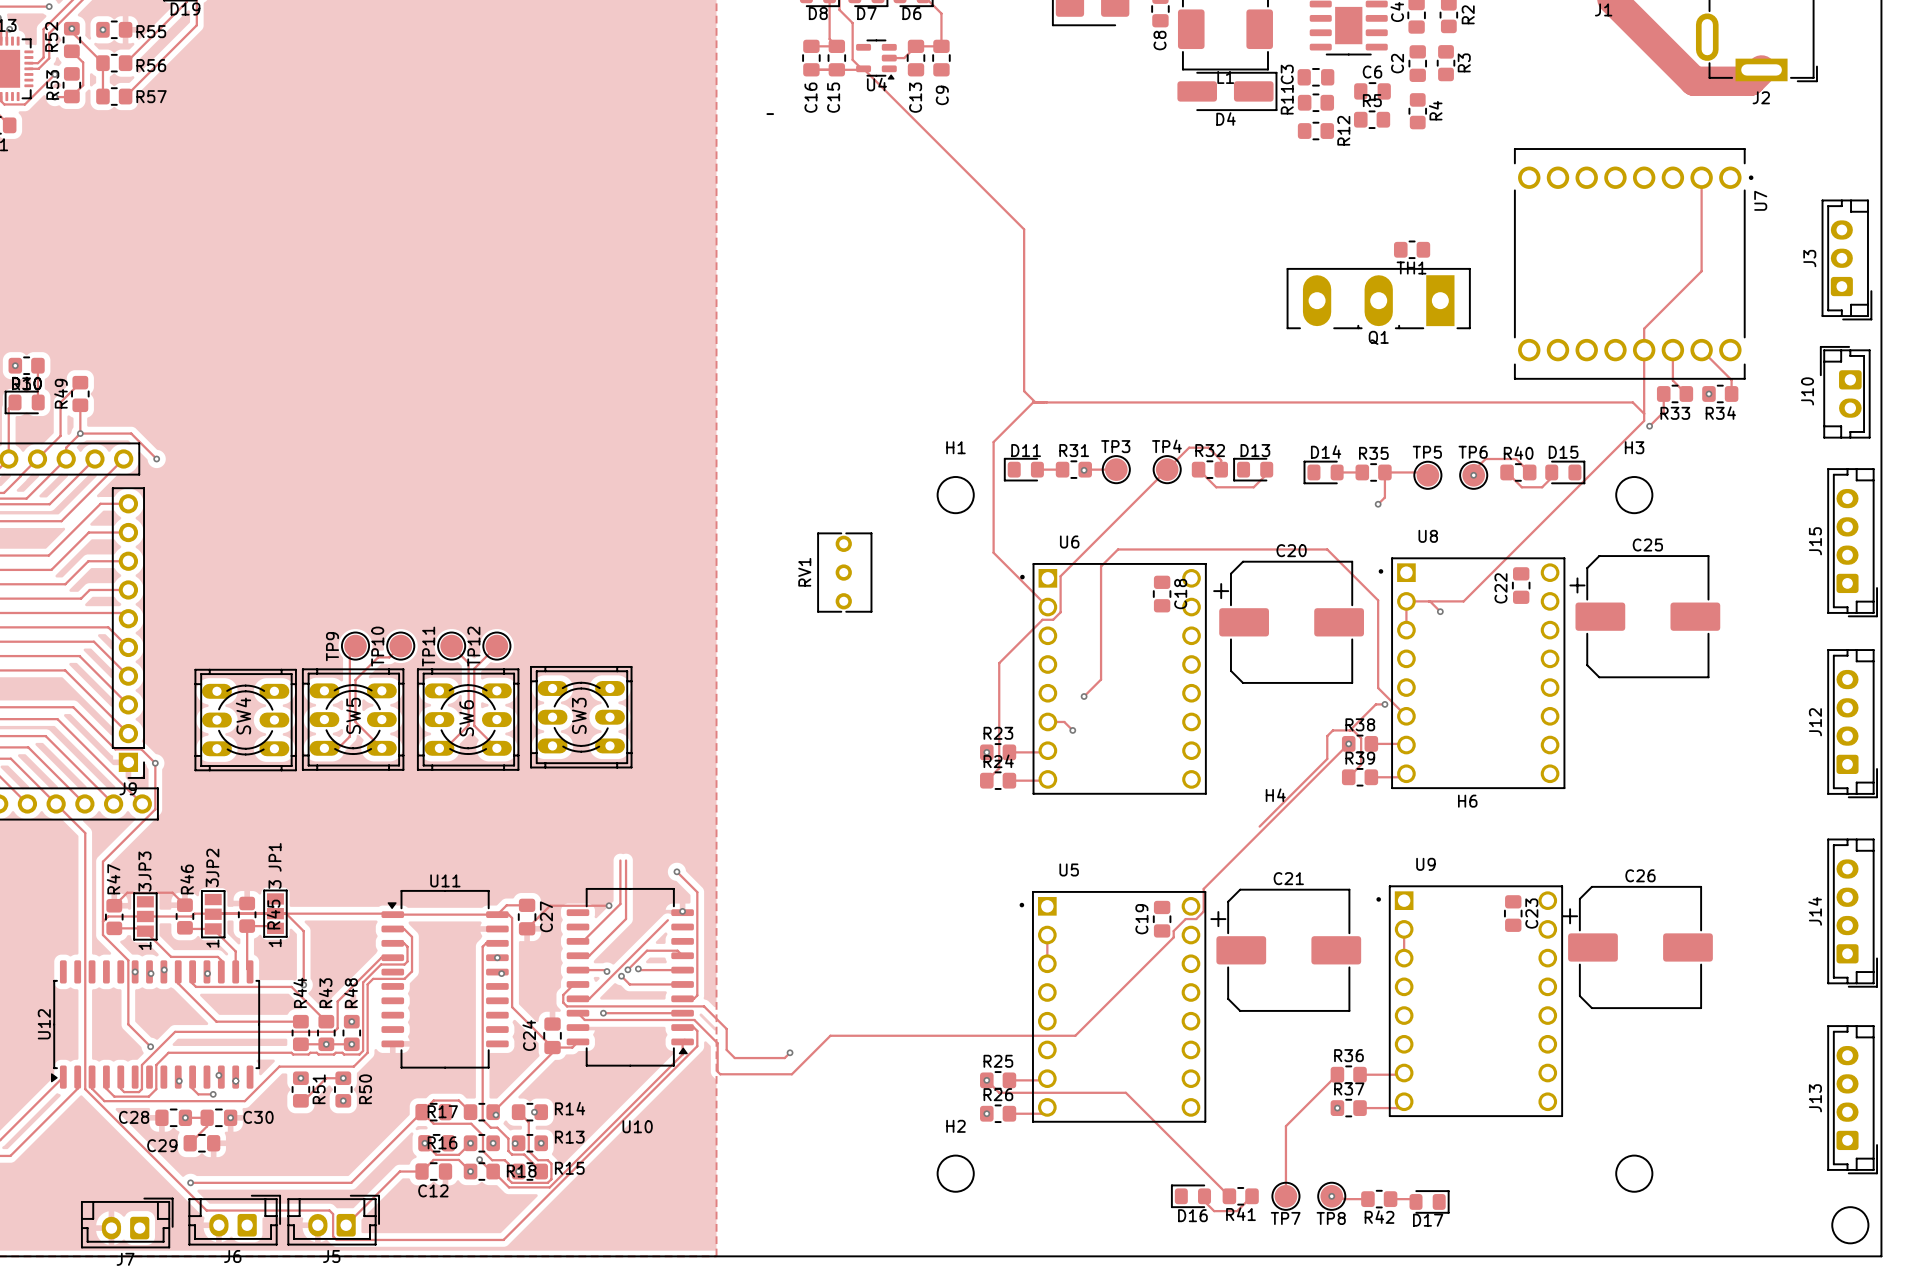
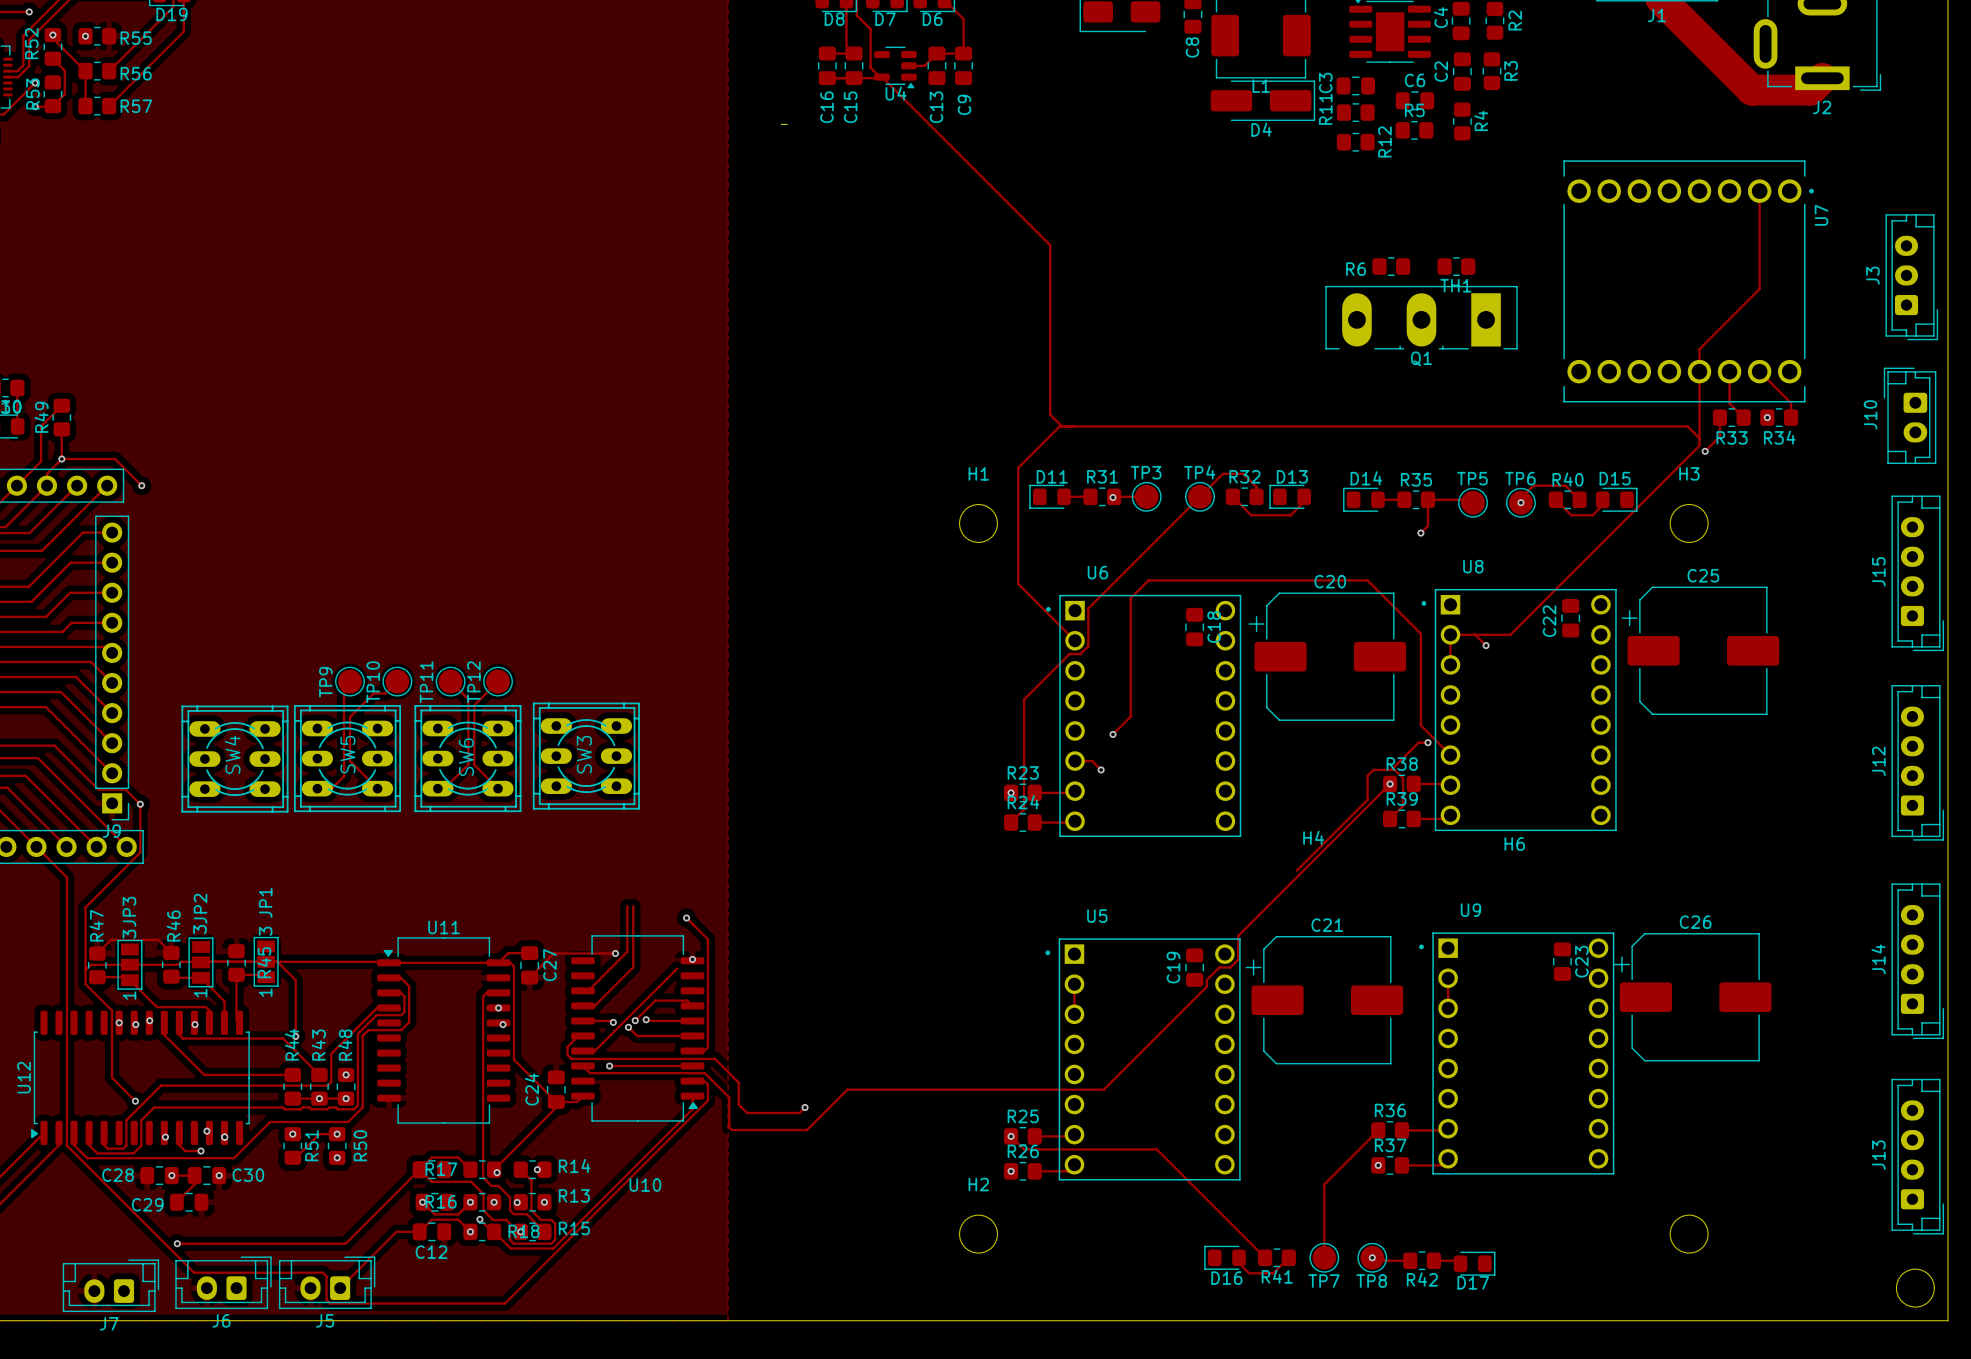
R6: none -> (1391, 266)
RV1: (844, 572) -> none

